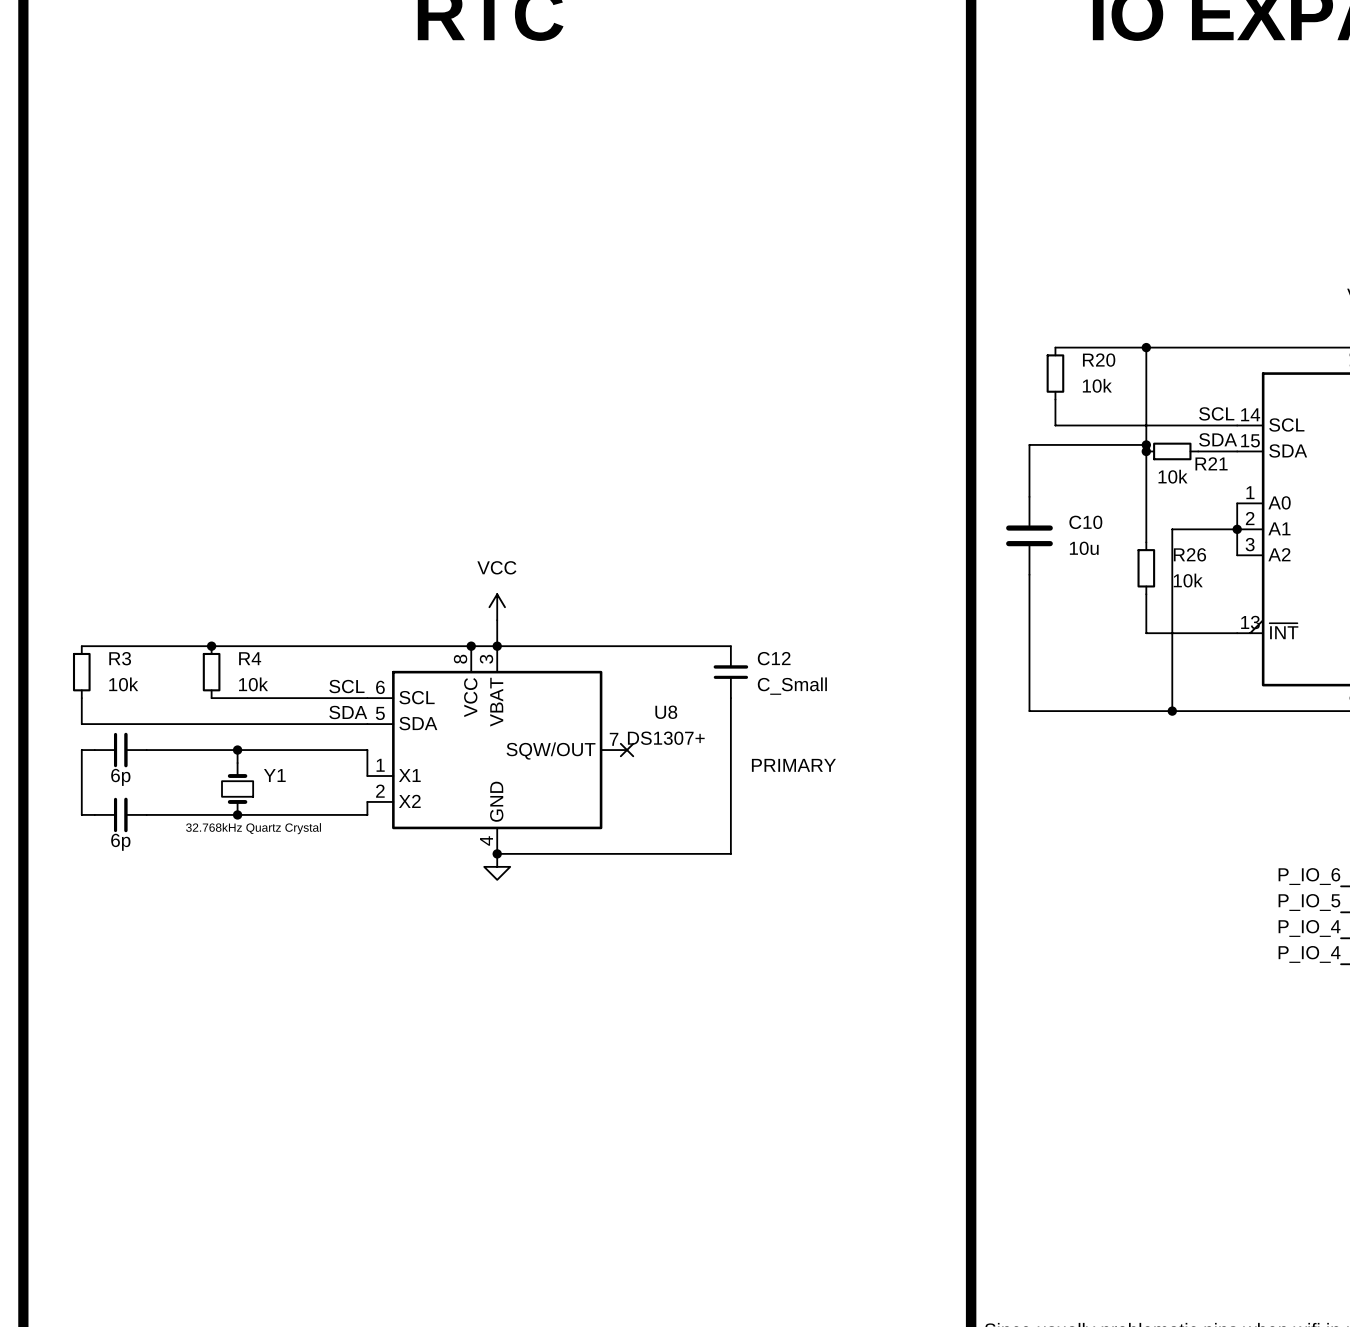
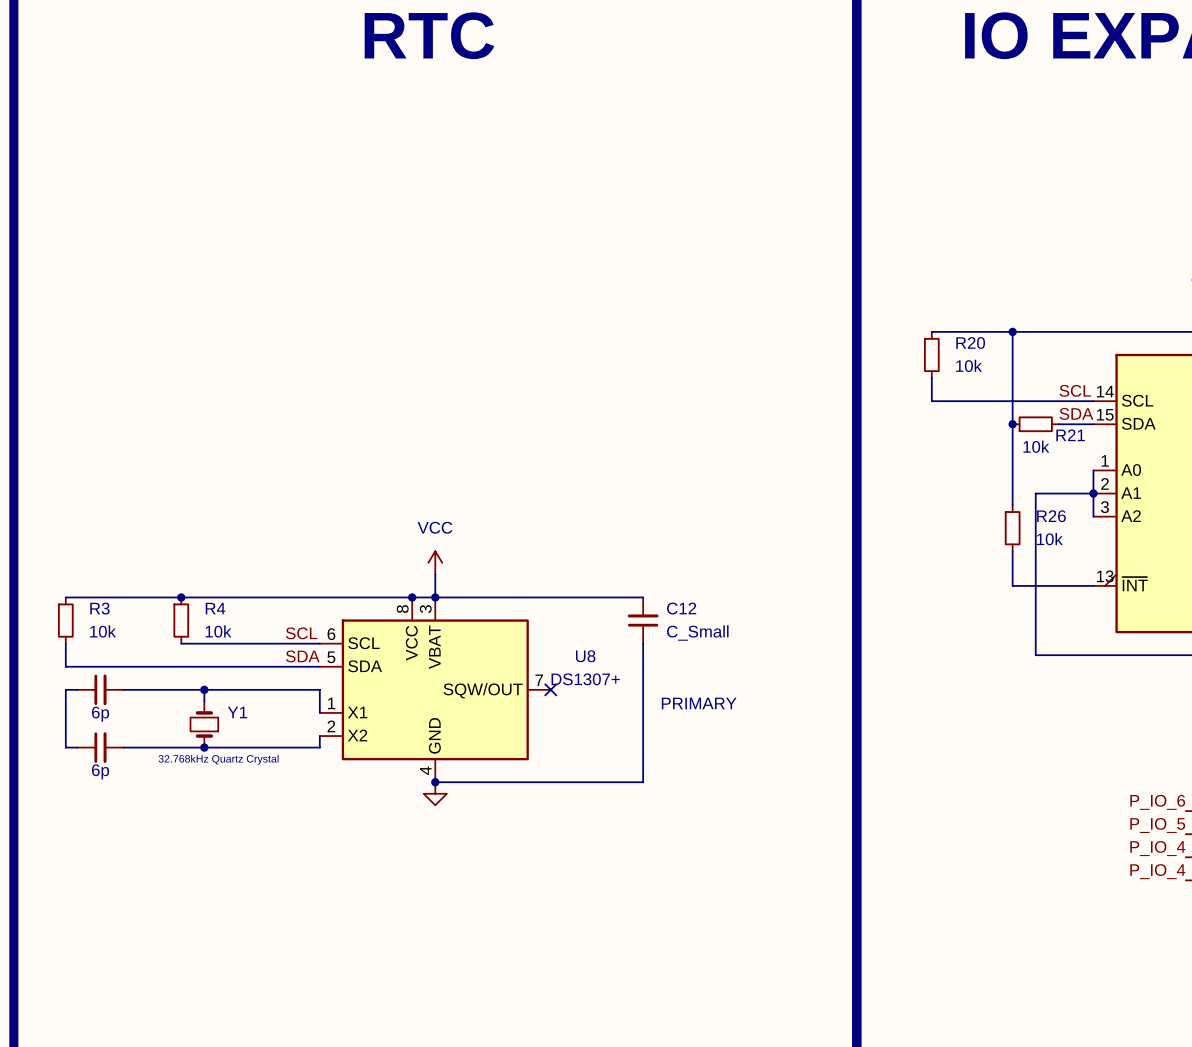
wire: (1146, 444) (1029, 444) (1029, 496) -> none
junction: (1146, 444) -> none
C10: 10u (1029, 535) -> none
wire: (1029, 574) (1029, 711) (1172, 711) -> none
junction: (1172, 711) -> none

